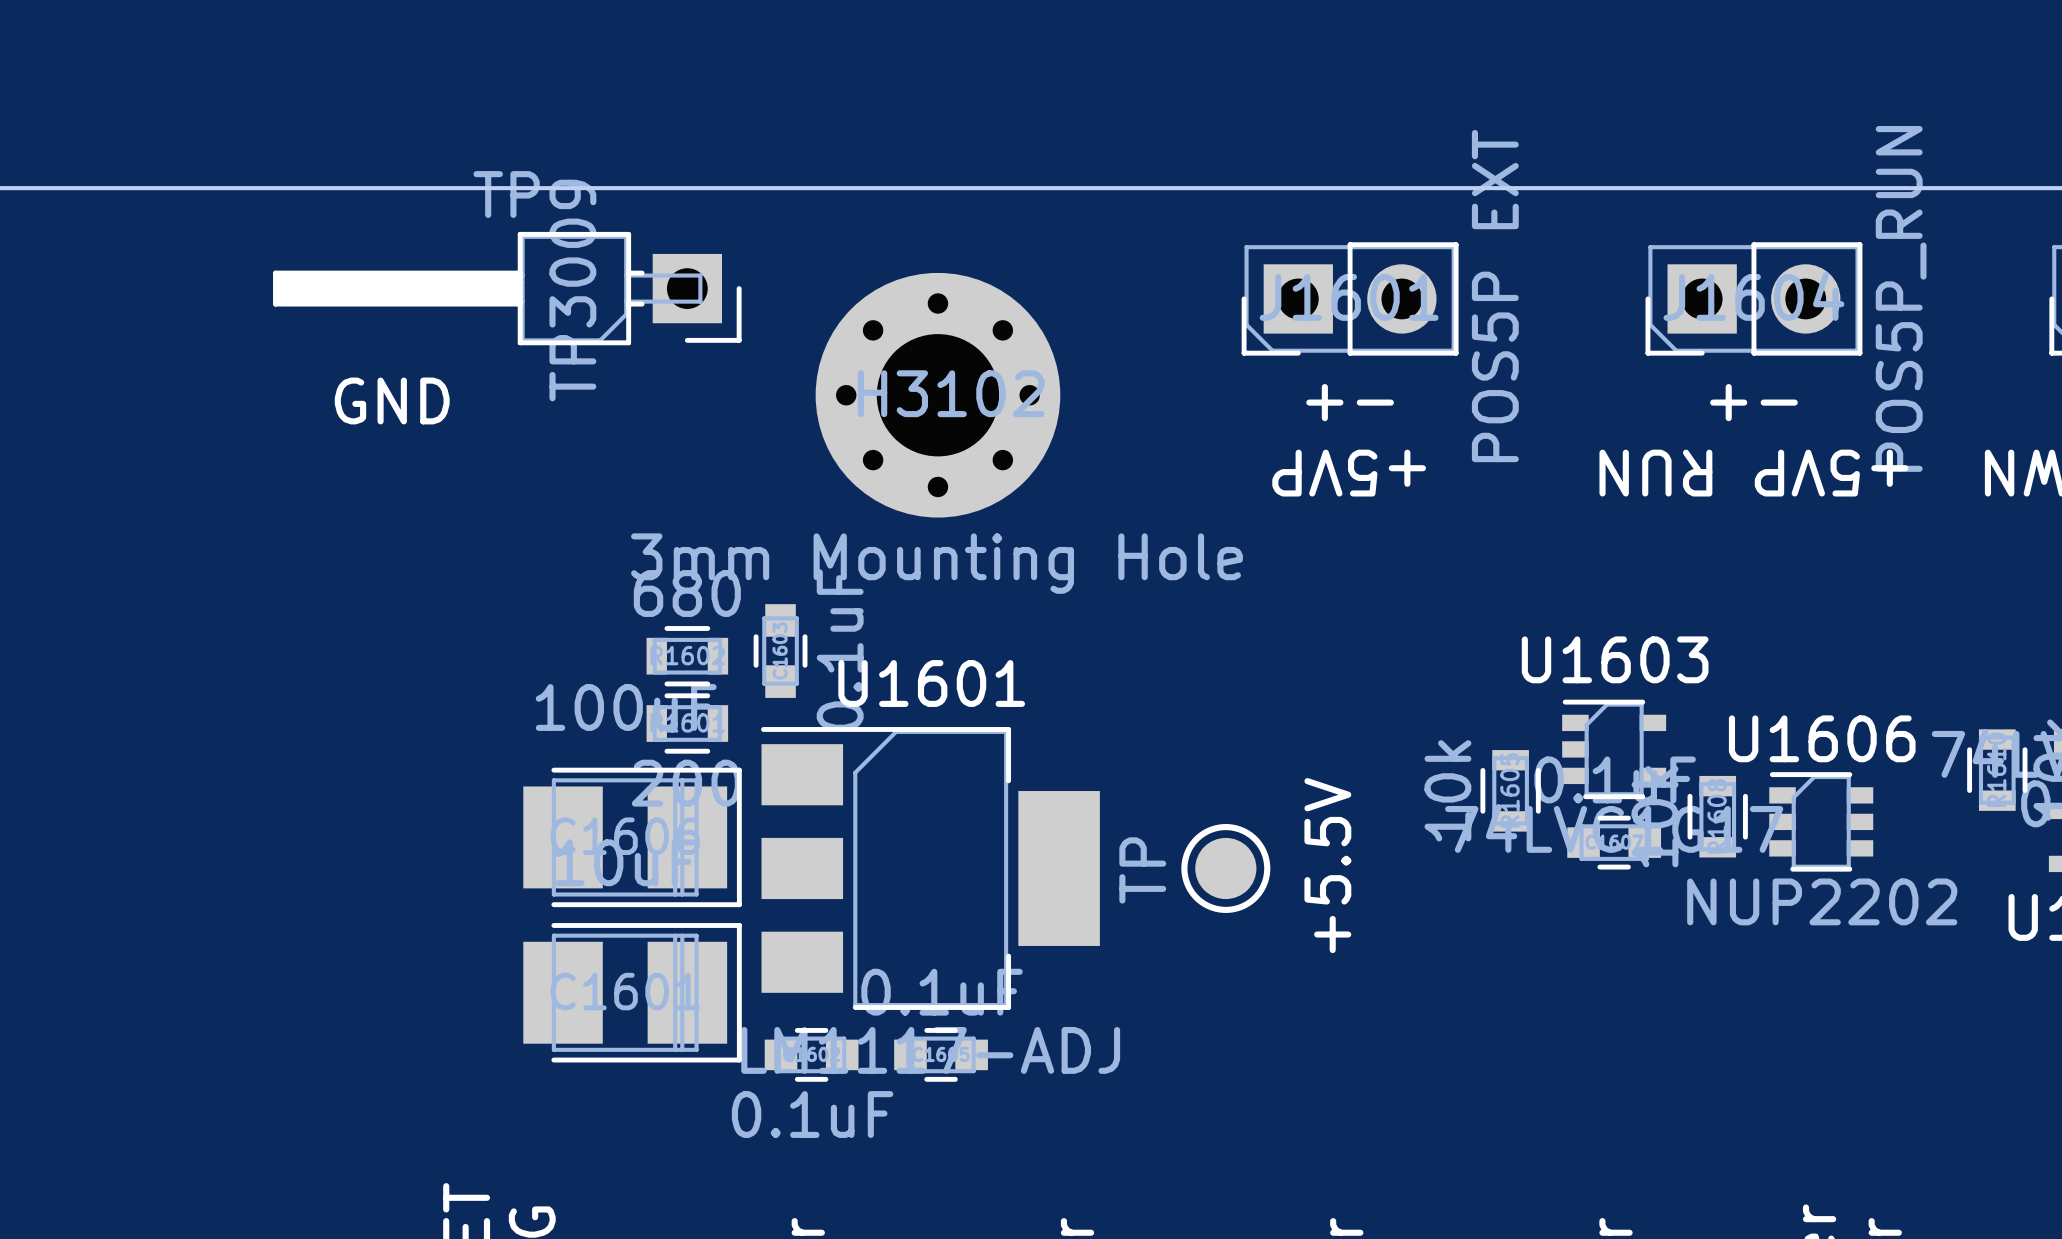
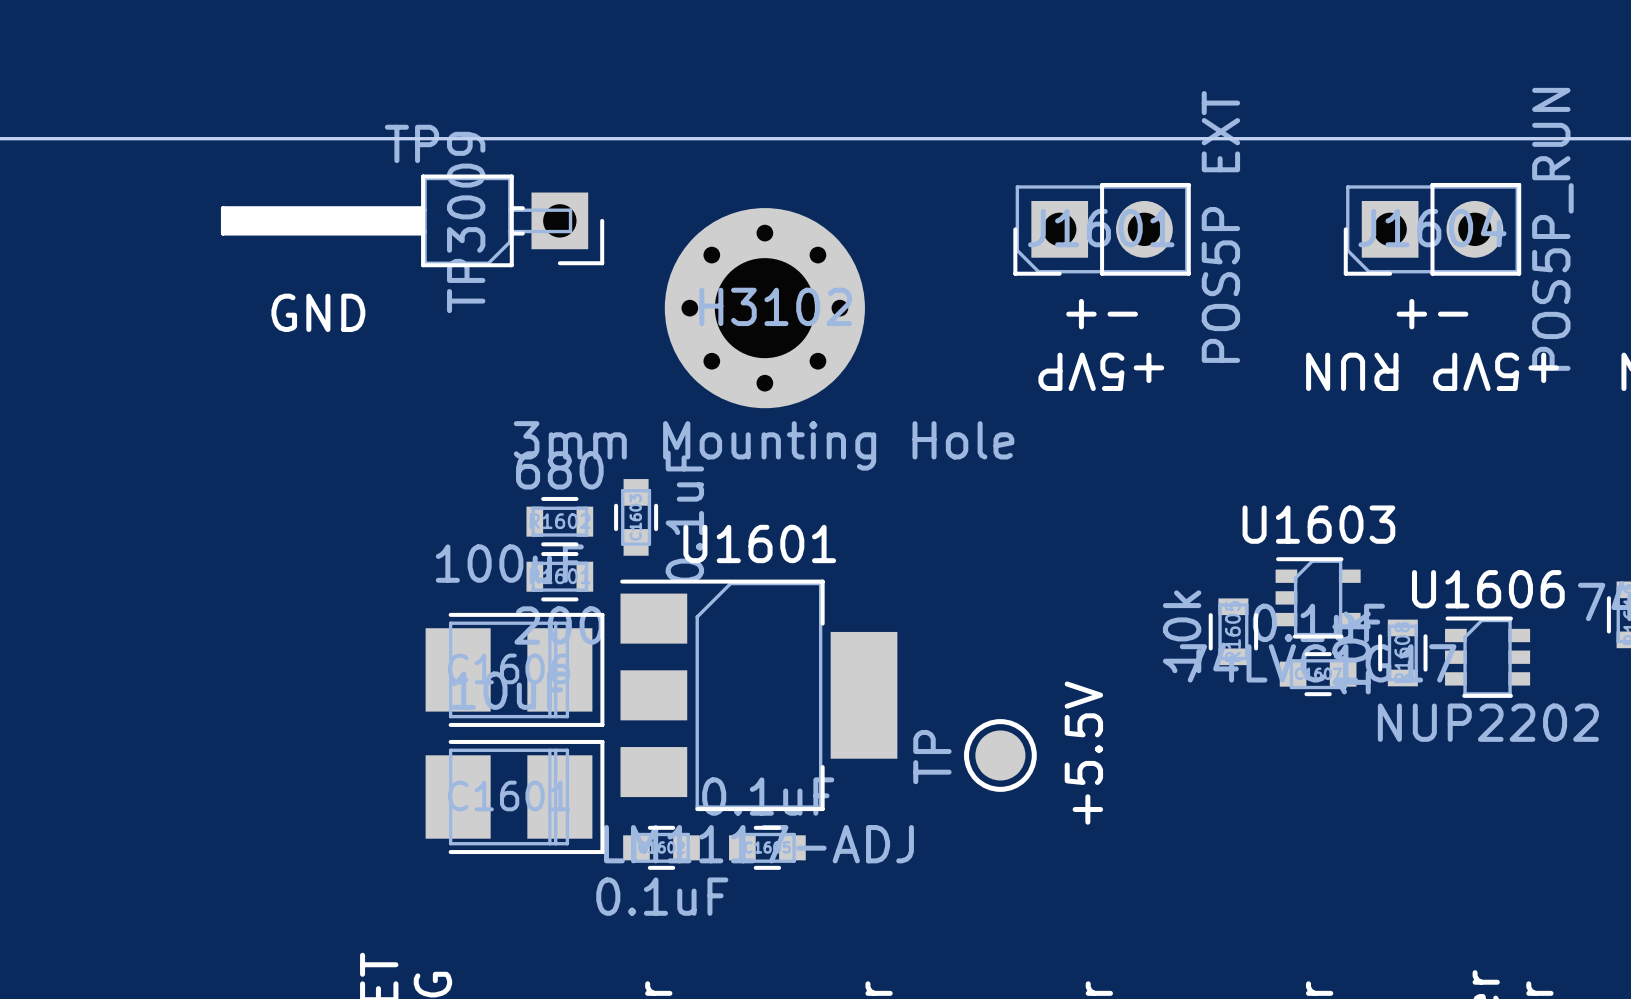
text position: +5.5V (1327, 865) -> +5.5V (1083, 753)
part position: (1225, 868) -> (1000, 755)

